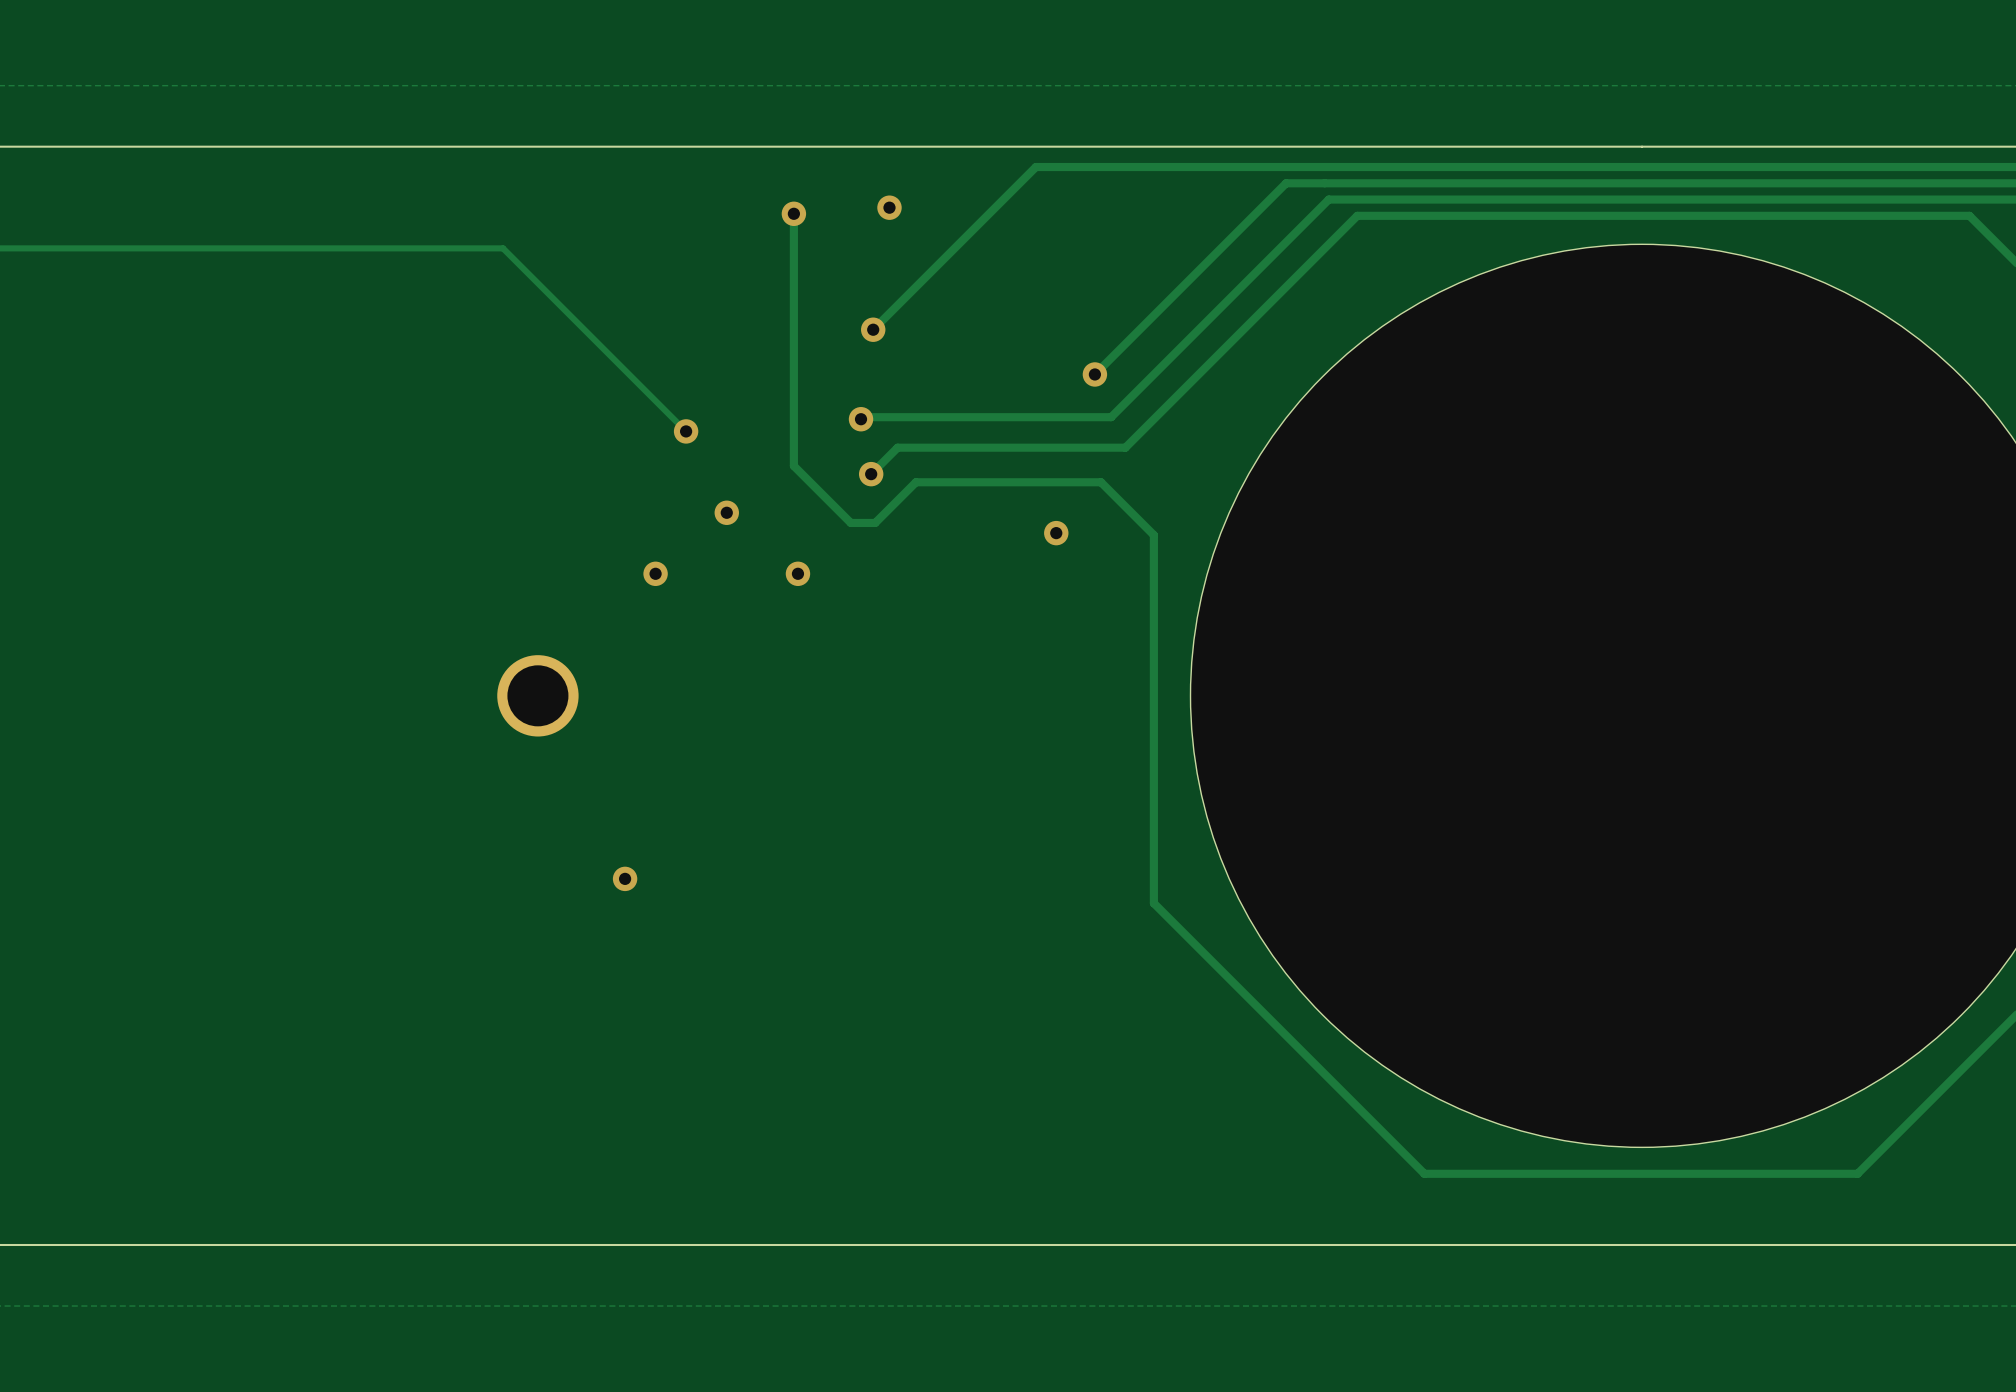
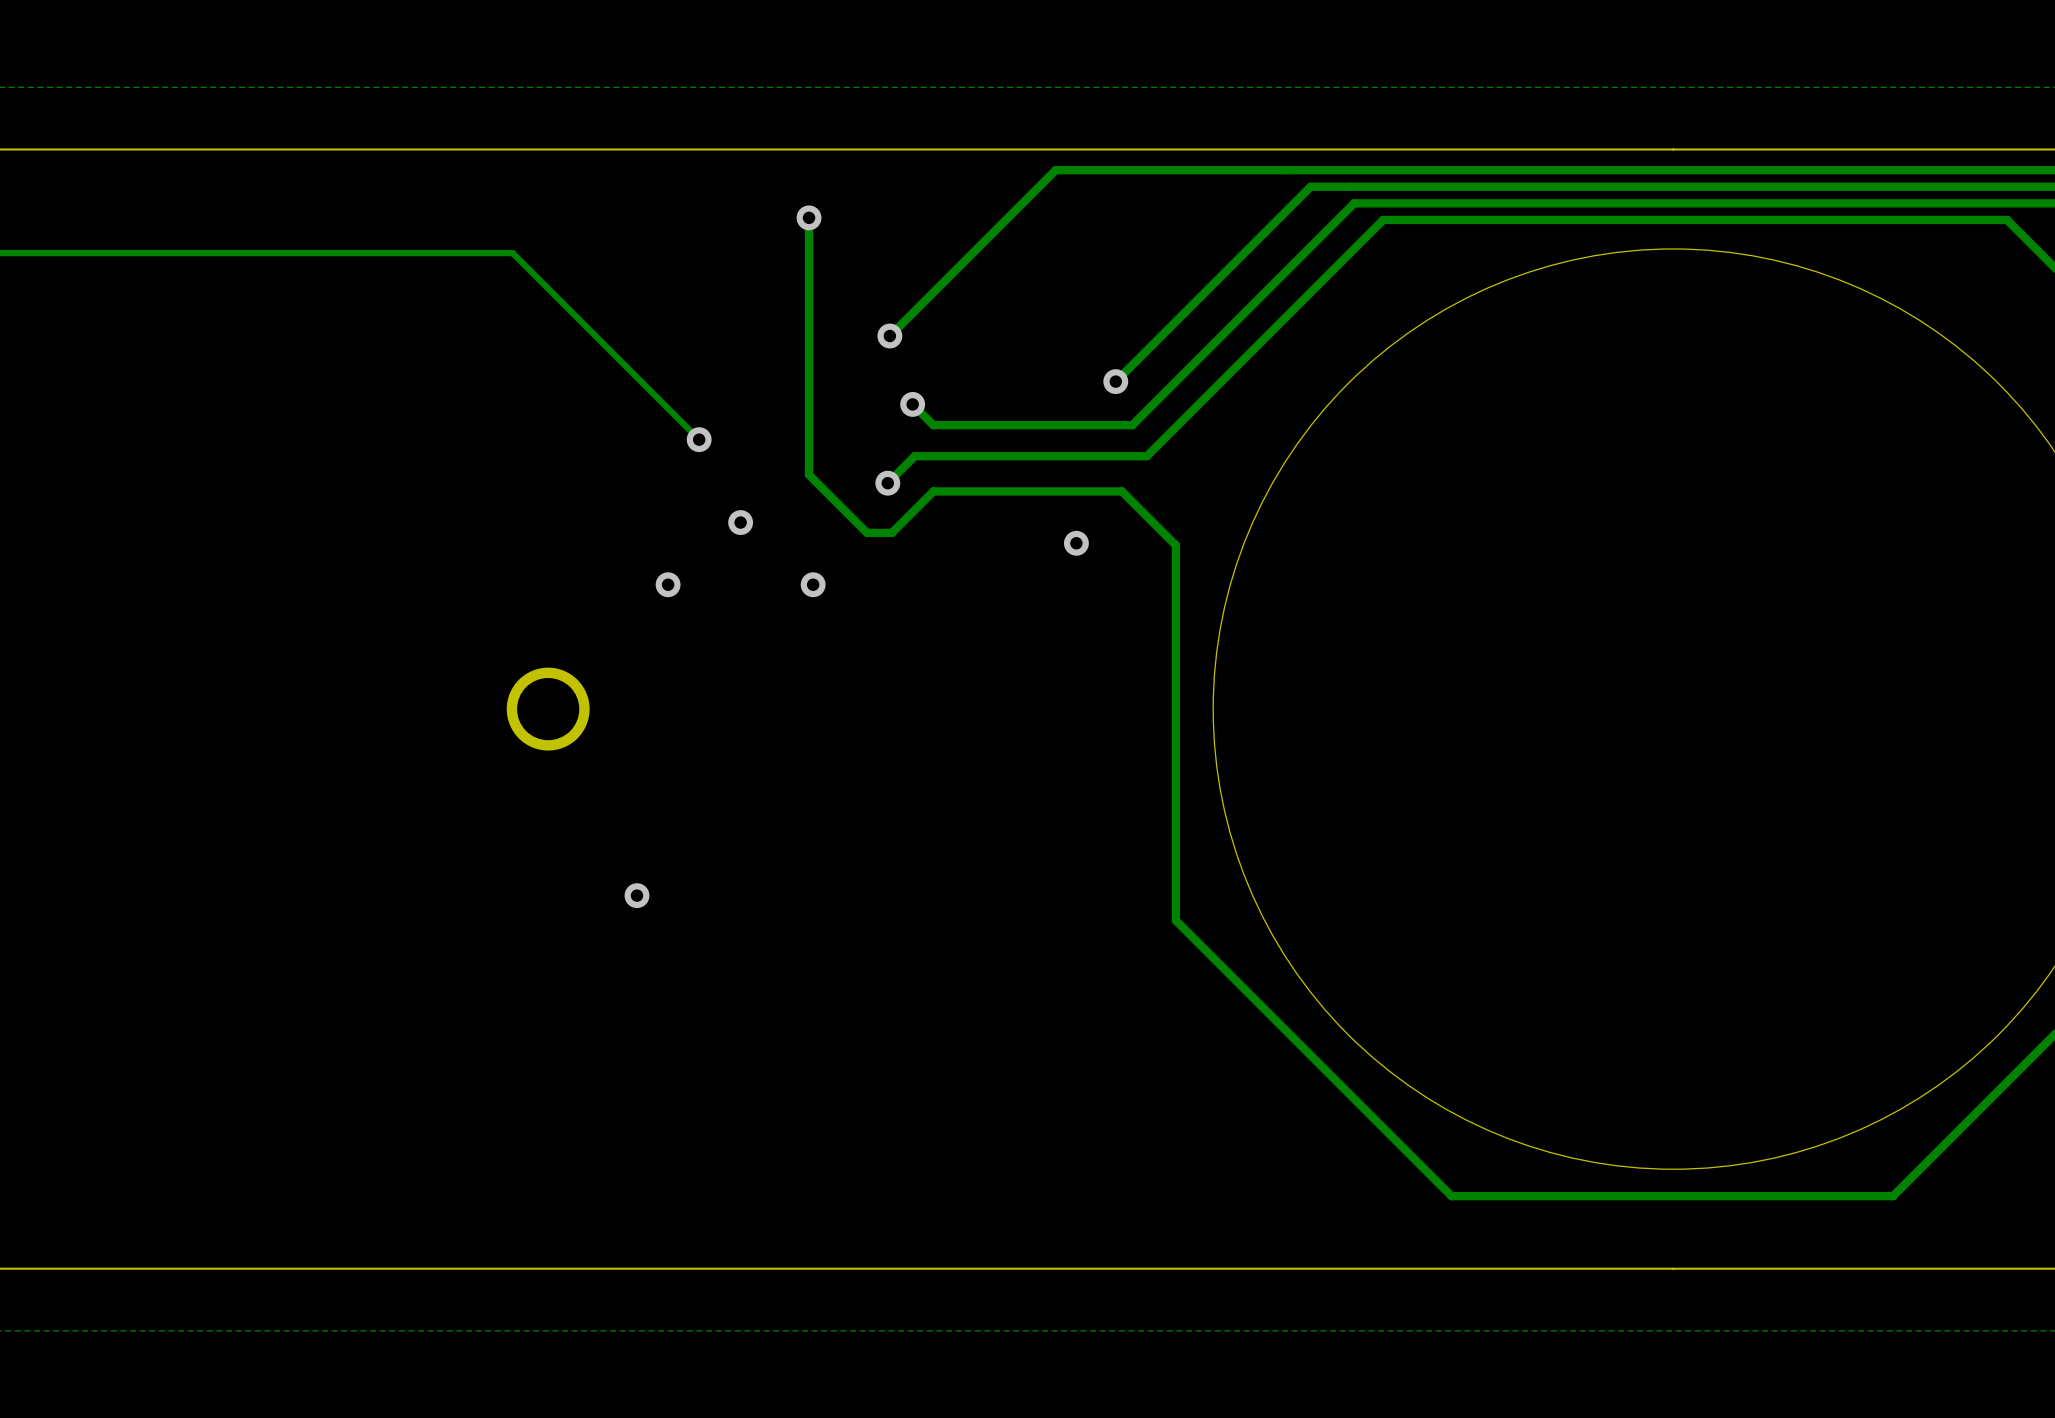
via: (889, 207) -> none
track: (915, 417) (863, 417) (861, 419) -> (933, 425) (912, 404)
via position: (861, 419) -> (912, 404)

